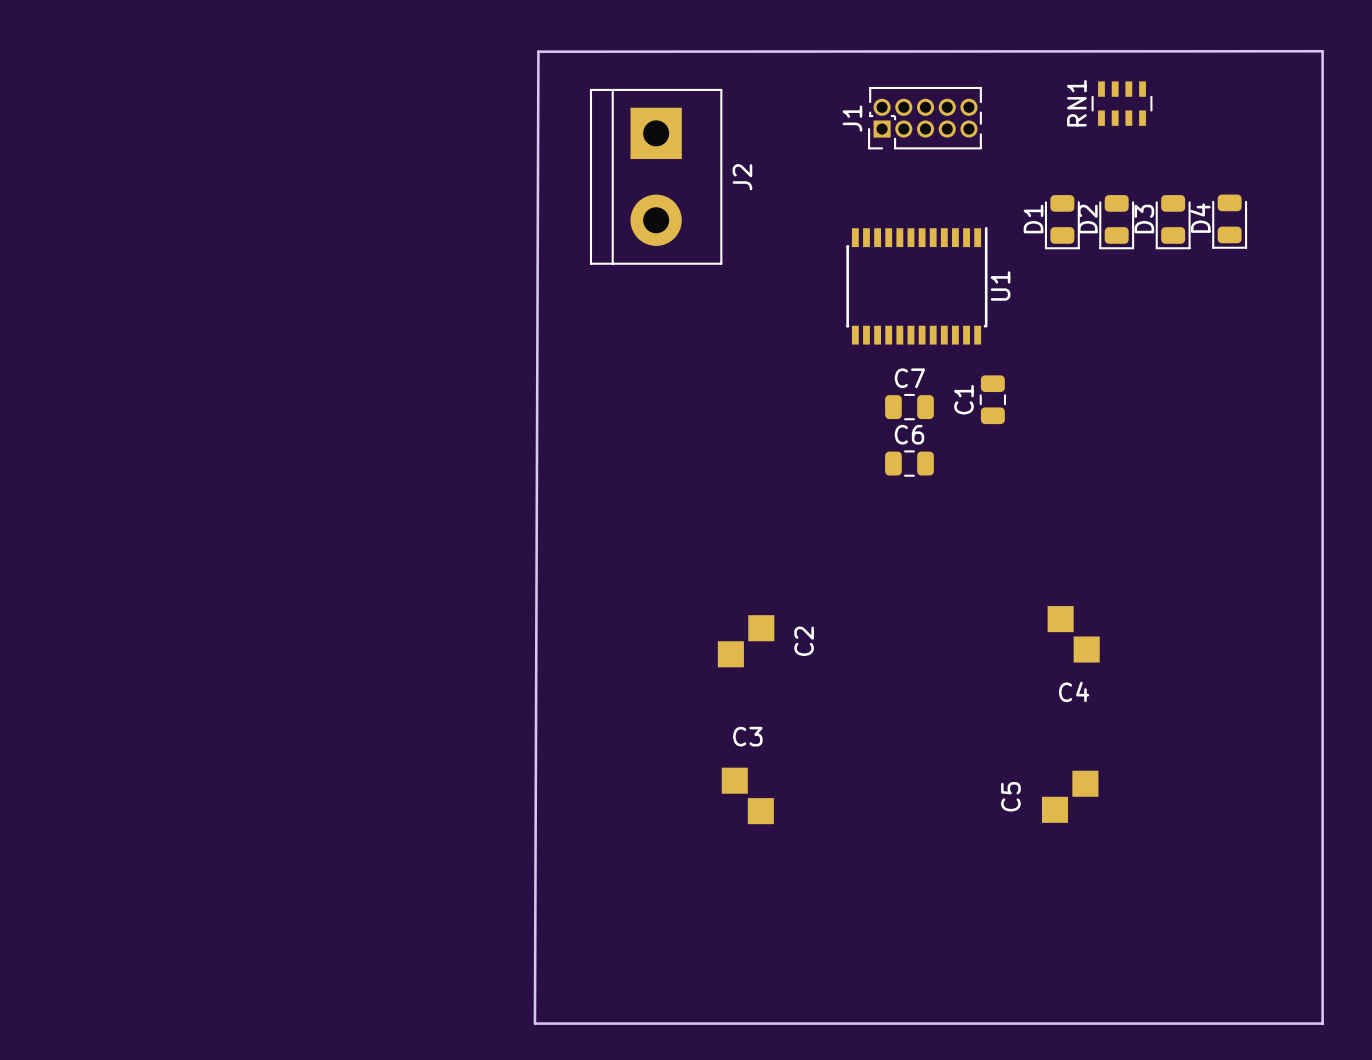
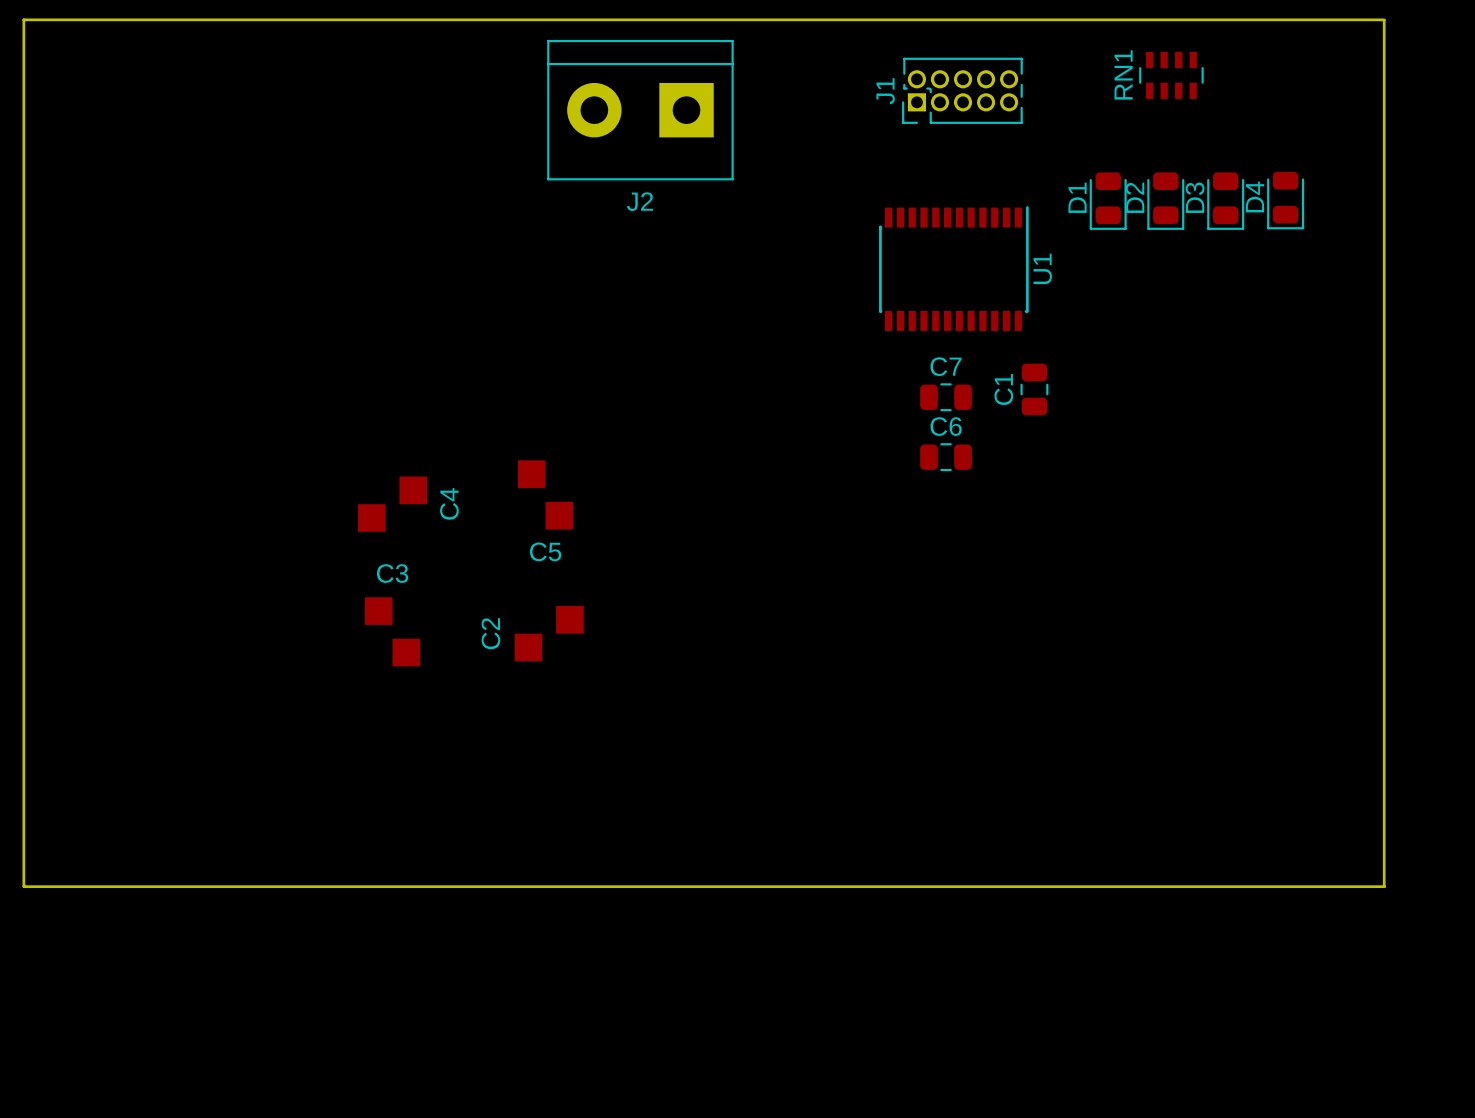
board edge: (1322, 51) (538, 51) (534, 1023) -> (1384, 19) (23, 19) (23, 886)
J2 rotation: 0° (656, 176) -> 90° clockwise (640, 110)
C4 footprint: [1047, 606, 1100, 663] -> [357, 476, 428, 532]
C2 footprint: [717, 615, 775, 668] -> [514, 606, 584, 662]
C2 name position: C2 (804, 641) -> C2 (490, 633)
C4 name position: C4 (1074, 691) -> C4 (449, 503)
C3 footprint: [721, 767, 774, 825] -> [364, 597, 421, 667]
C5 footprint: [1041, 770, 1099, 823] -> [517, 460, 574, 530]
C5 name position: C5 (1010, 796) -> C5 (545, 551)
board edge: (1322, 868) (1322, 1024) -> (1384, 886) (23, 886)
board edge: (534, 1023) (1322, 1023) -> none

